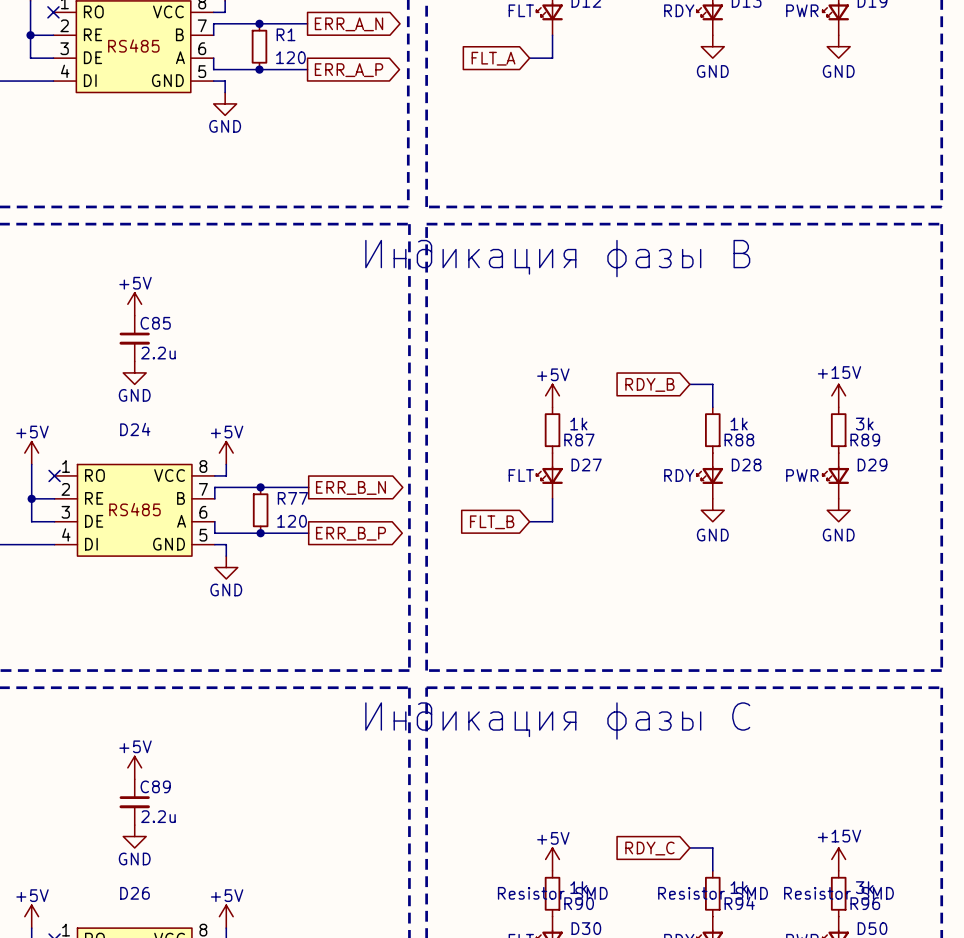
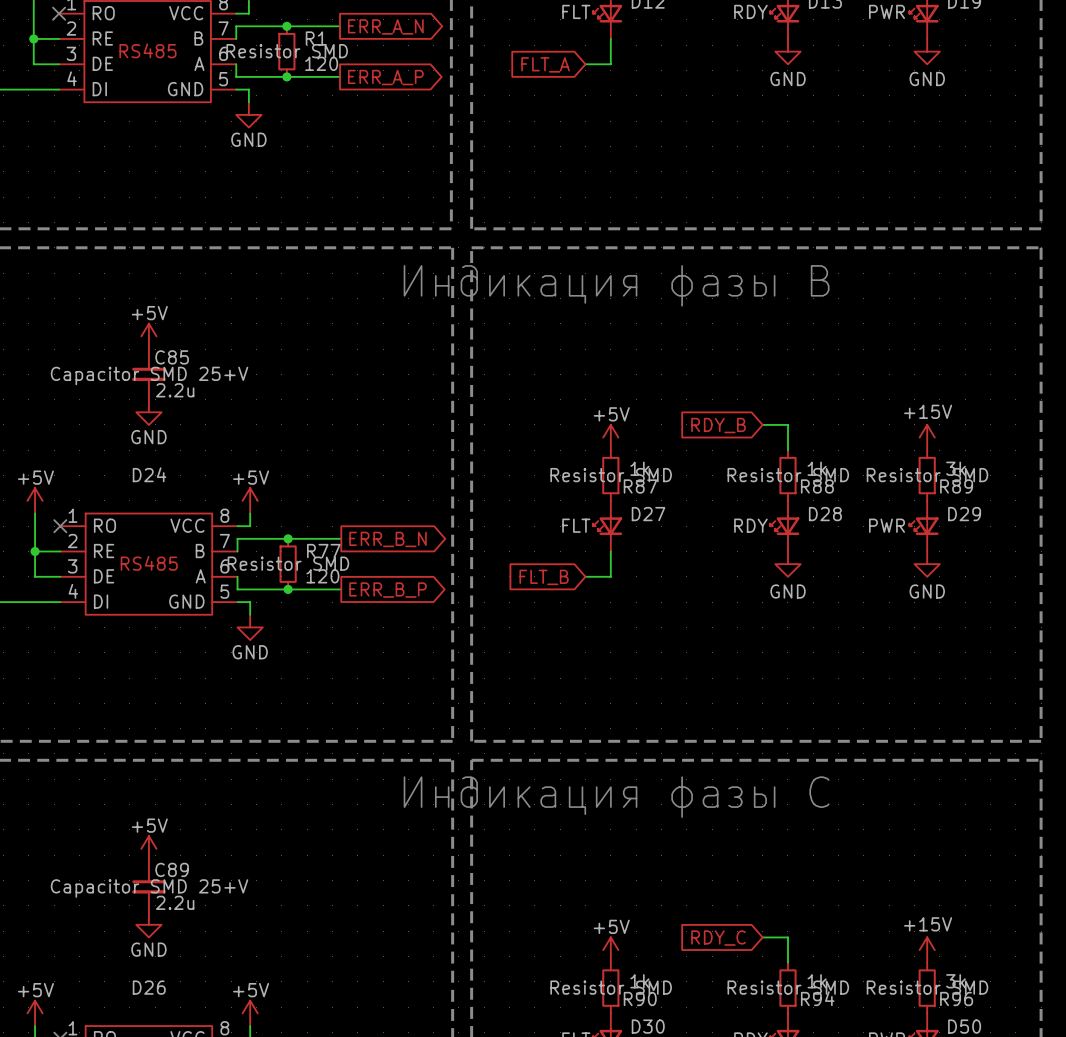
R1 text: none -> Resistor SMD (287, 51)
C85 text: none -> Capacitor SMD 25+V (149, 375)
R87 text: none -> Resistor SMD (611, 475)
R88 text: none -> Resistor SMD (788, 475)
R89 text: none -> Resistor SMD (927, 475)
R77 text: none -> Resistor SMD (288, 563)
C89 text: none -> Capacitor SMD 25+V (149, 888)

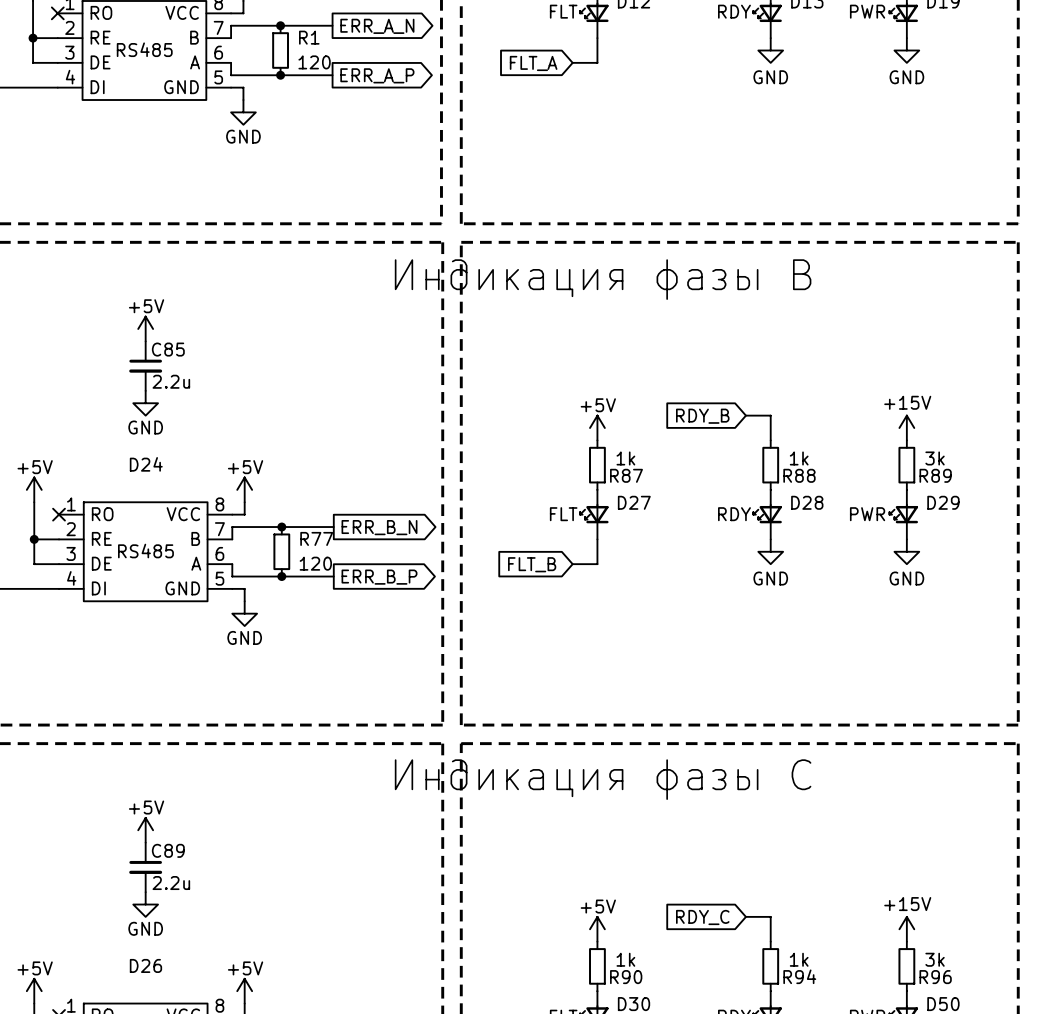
R1 text: Resistor SMD (287, 51) -> none
C85 text: Capacitor SMD 25+V (149, 375) -> none
R87 text: Resistor SMD (611, 475) -> none
R88 text: Resistor SMD (788, 475) -> none
R89 text: Resistor SMD (927, 475) -> none
R77 text: Resistor SMD (288, 563) -> none
C89 text: Capacitor SMD 25+V (149, 888) -> none
R90 text: Resistor SMD (611, 987) -> none
R94 text: Resistor SMD (788, 987) -> none
R96 text: Resistor SMD (927, 987) -> none

